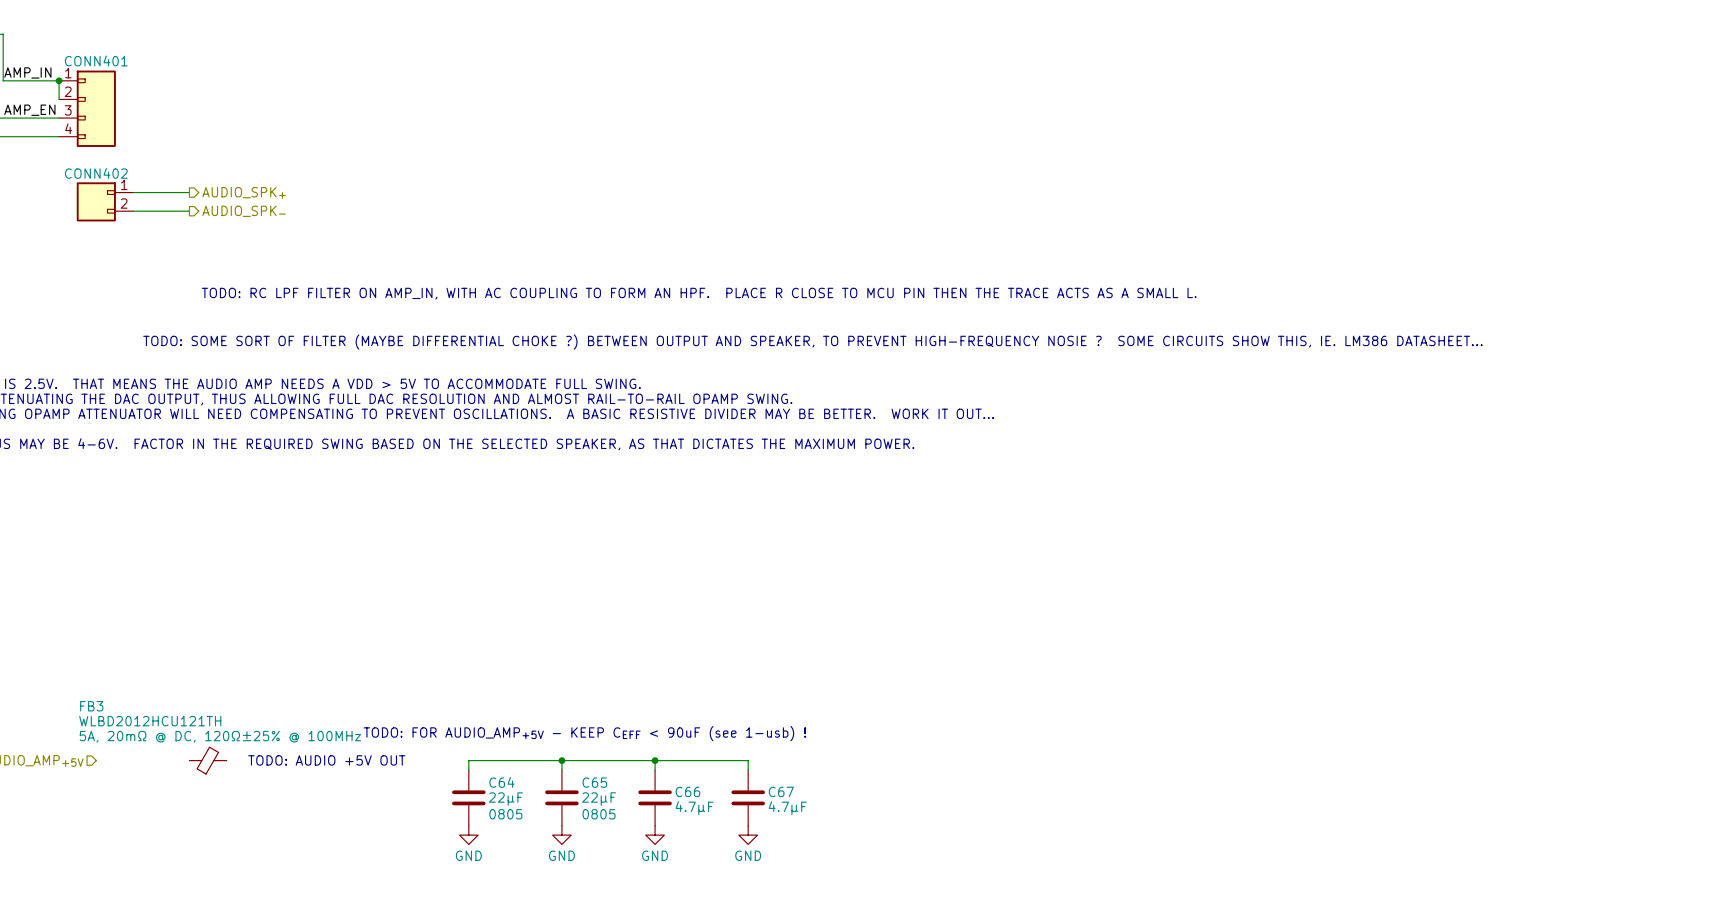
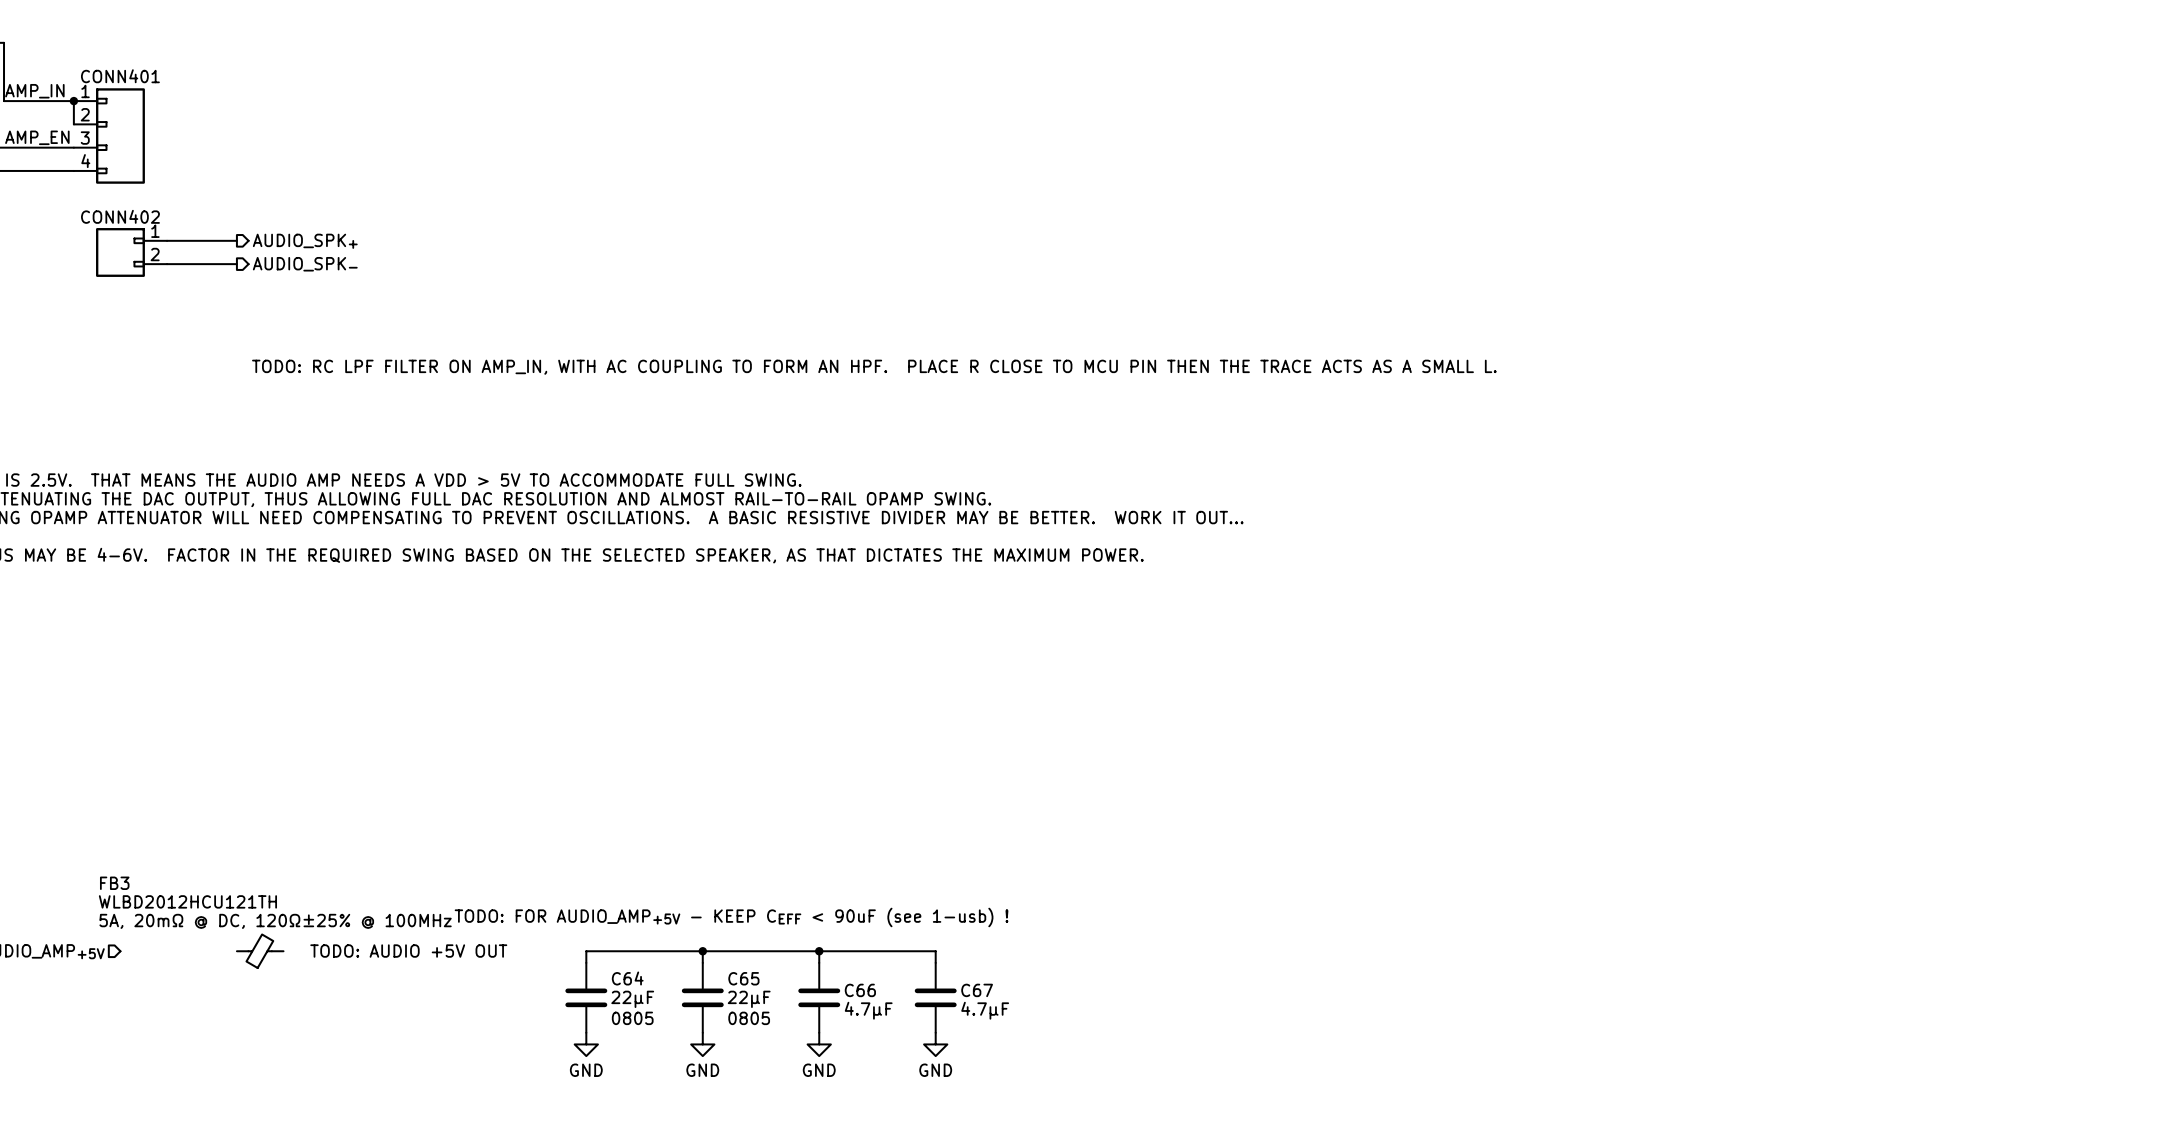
text: TODO: SOME SORT OF FILTER (MAYBE DIFFERENTIAL CHOKE ?) BETWEEN OUTPUT AND SPEAKER, TO PREVENT HIGH-FREQUENCY NOSIE ? SOME CIRCUITS SHOW THIS, IE. LM386 DATASHEET... (812, 342) -> none

